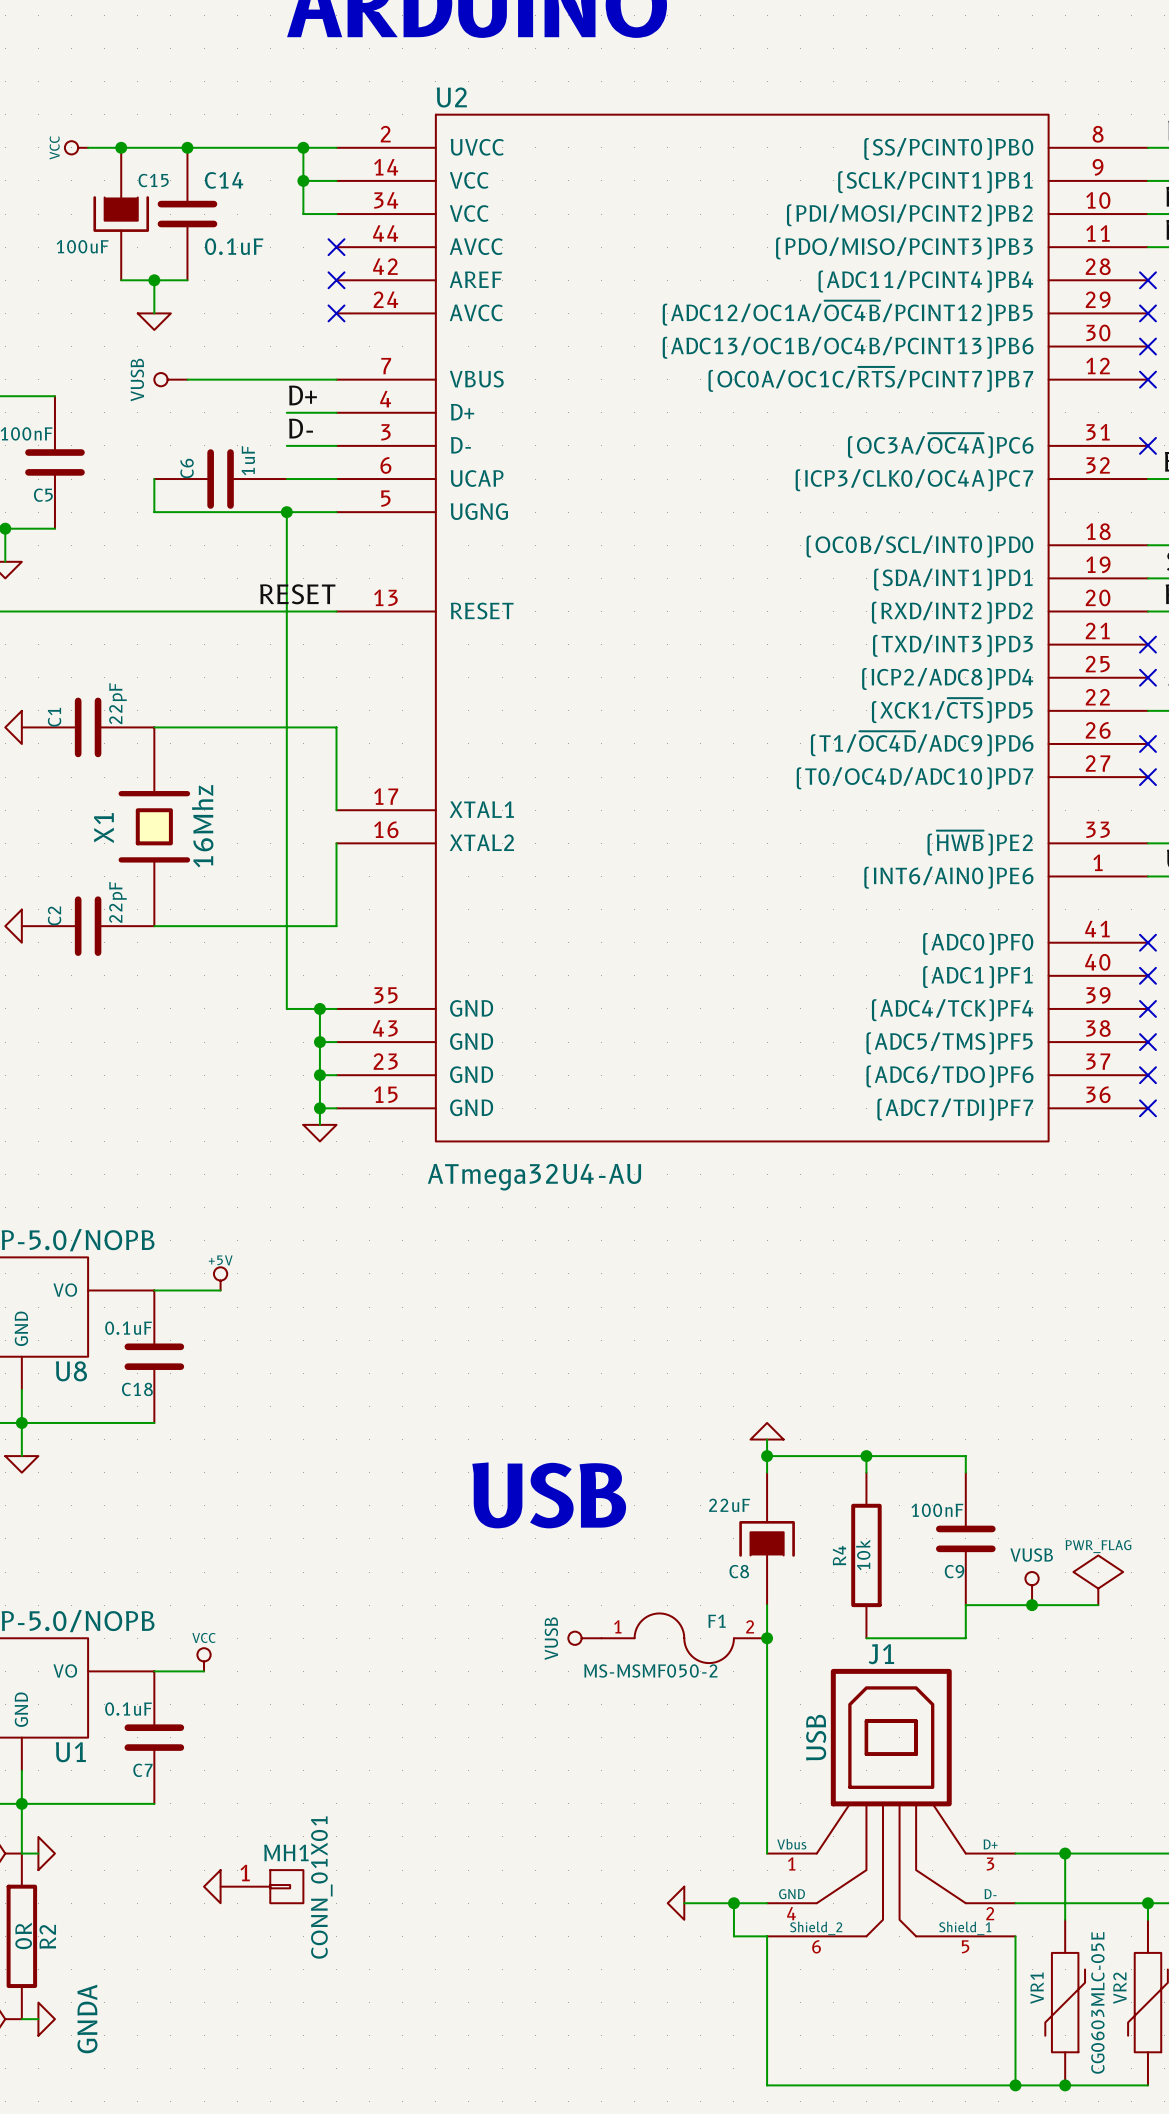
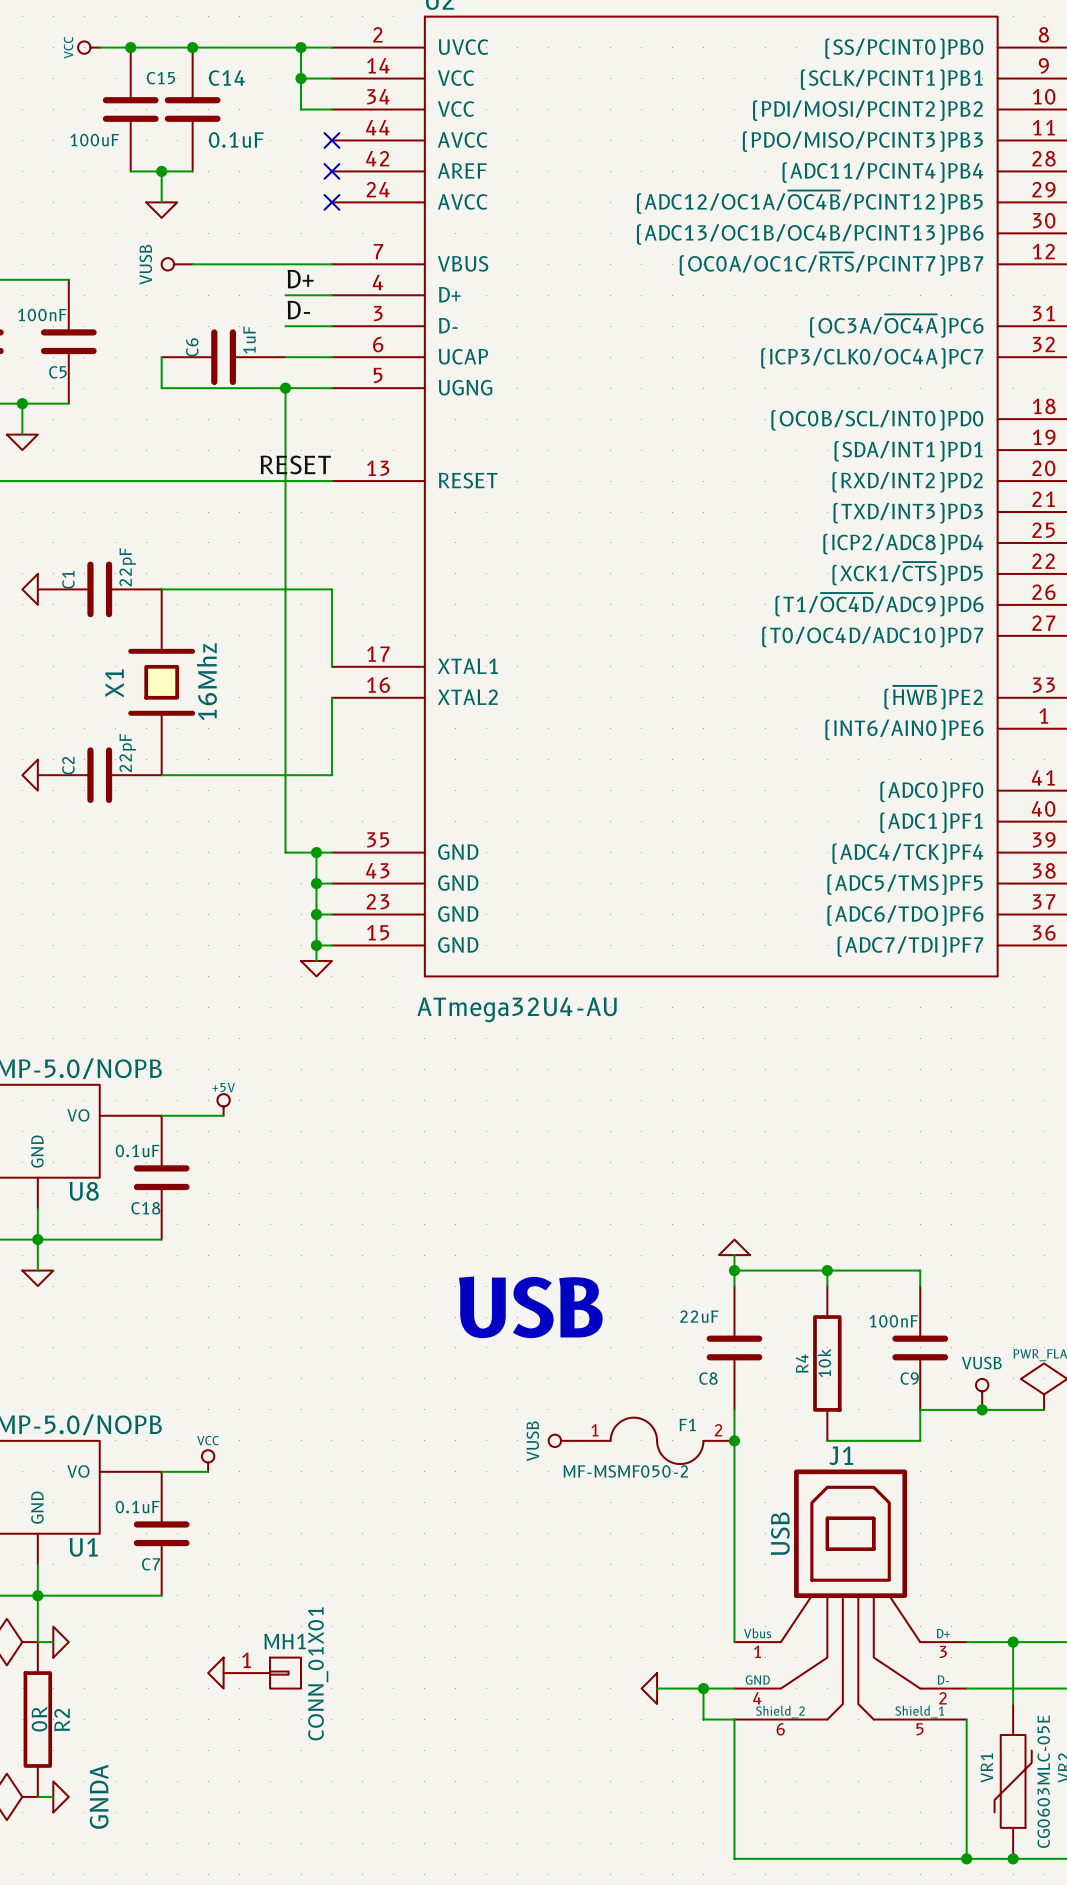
C15 symbol: [93, 147, 150, 281] -> [102, 47, 159, 172]
C8 symbol: [739, 1472, 795, 1606] -> [706, 1286, 763, 1410]
F1 value: MS-MSMF050-2 (650, 1670) -> MF-MSMF050-2 (625, 1471)

